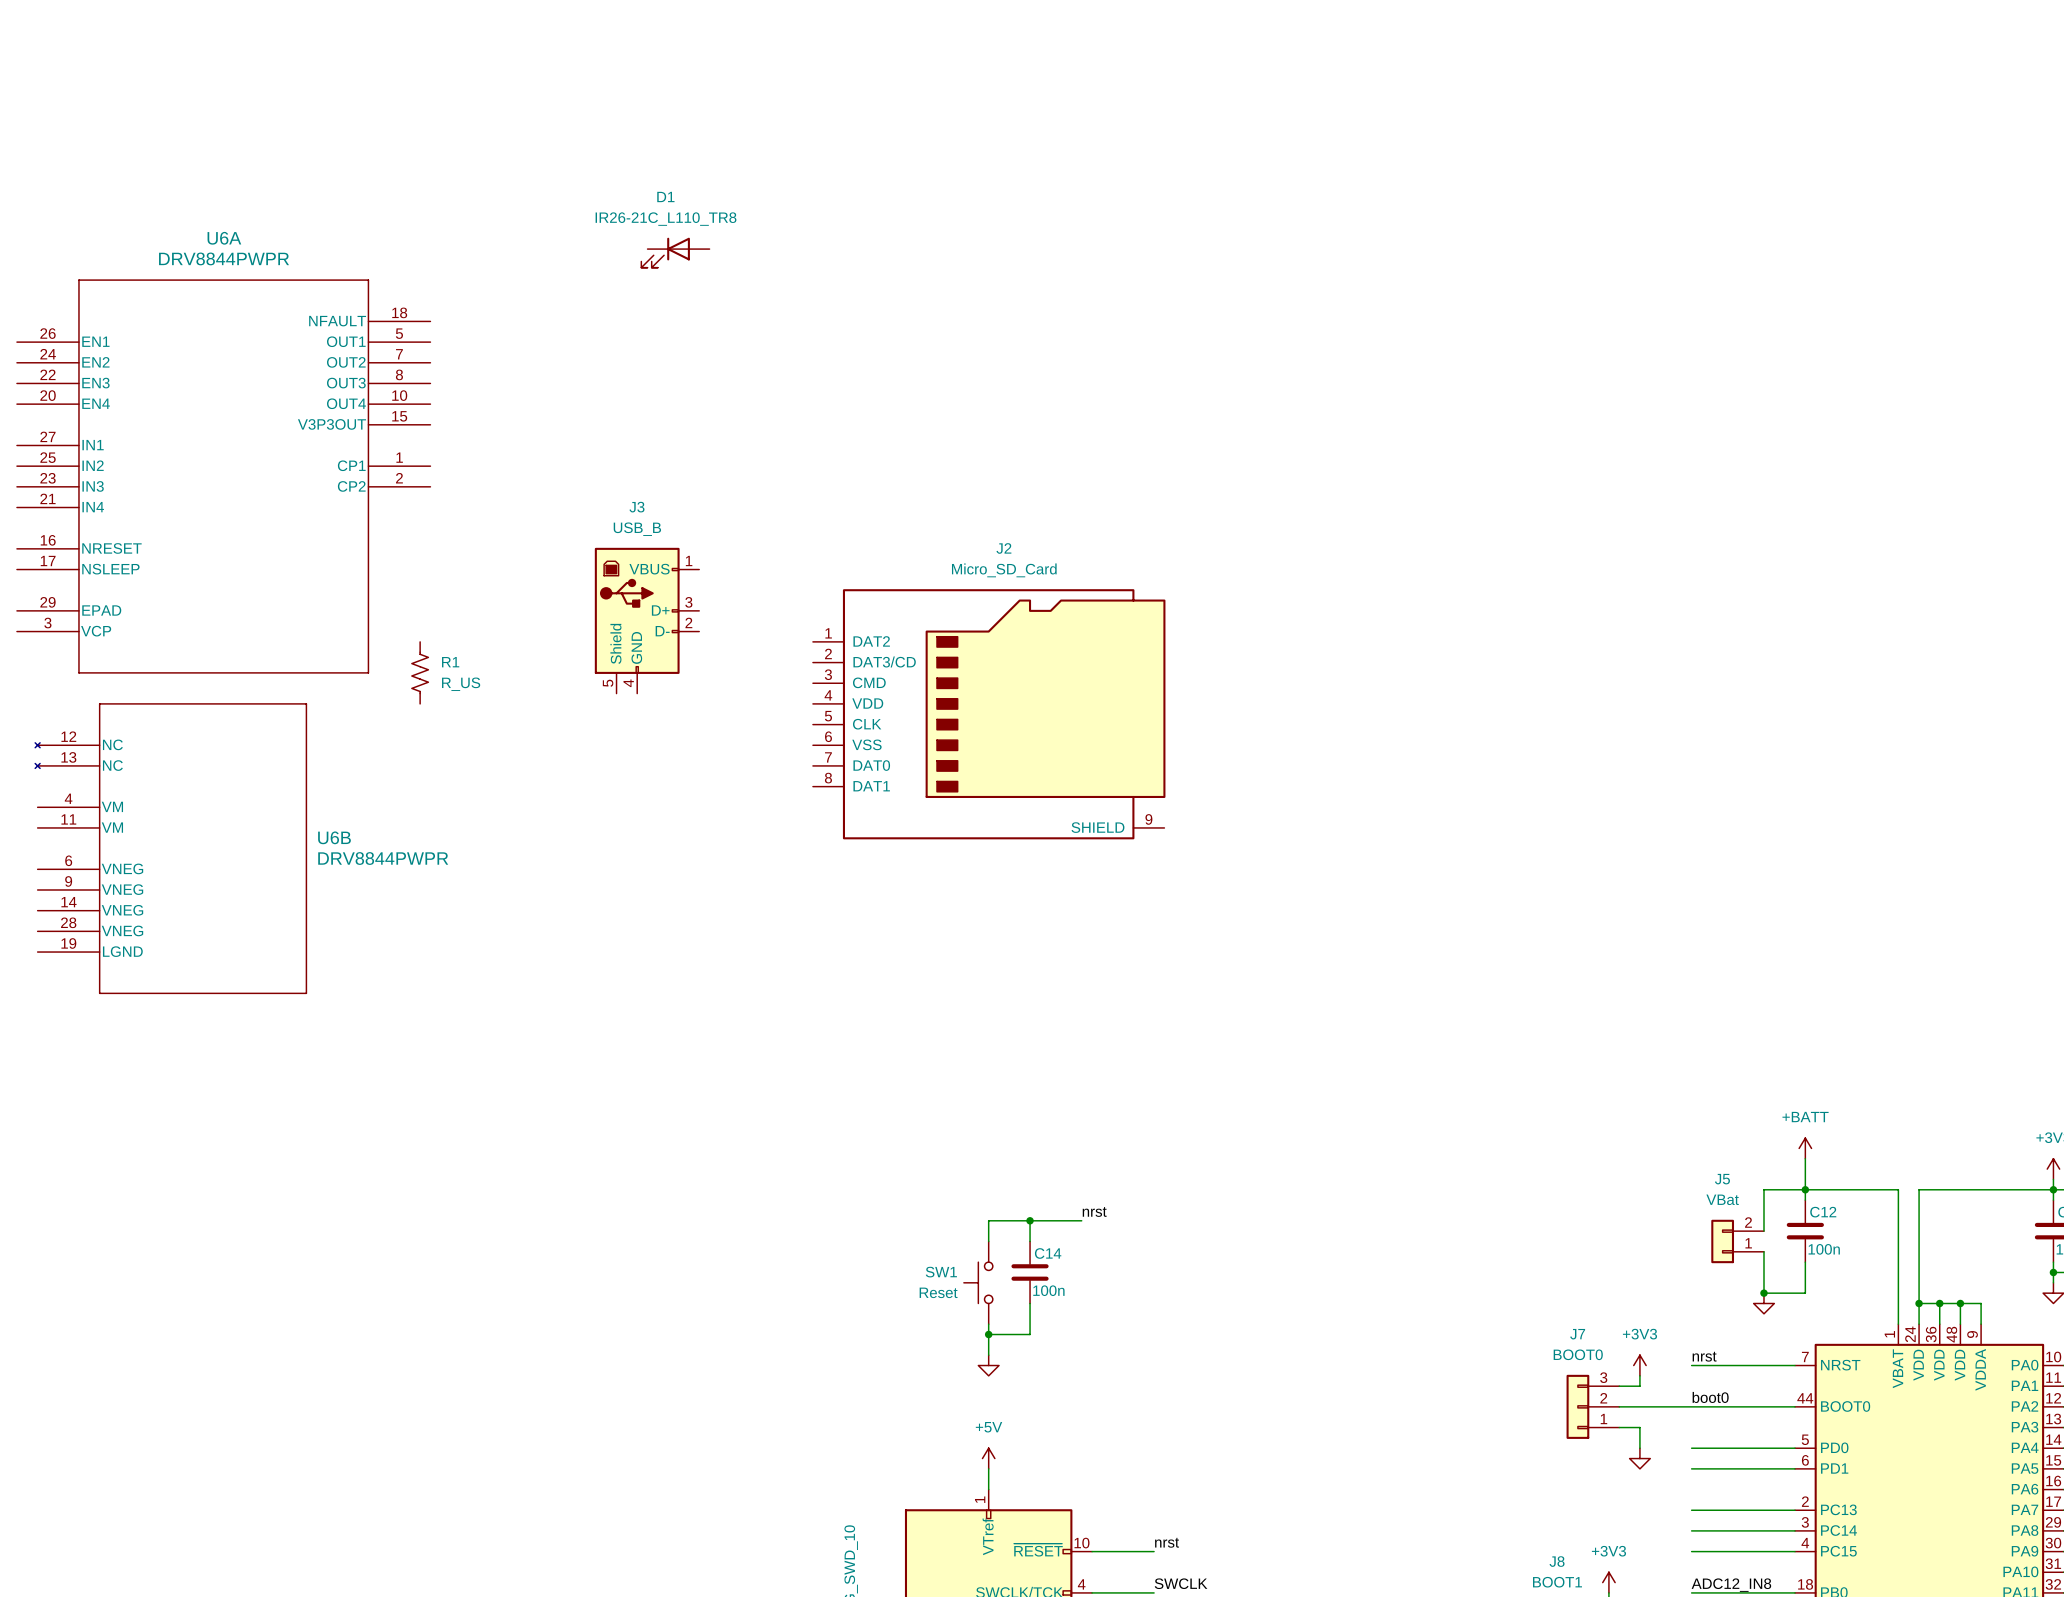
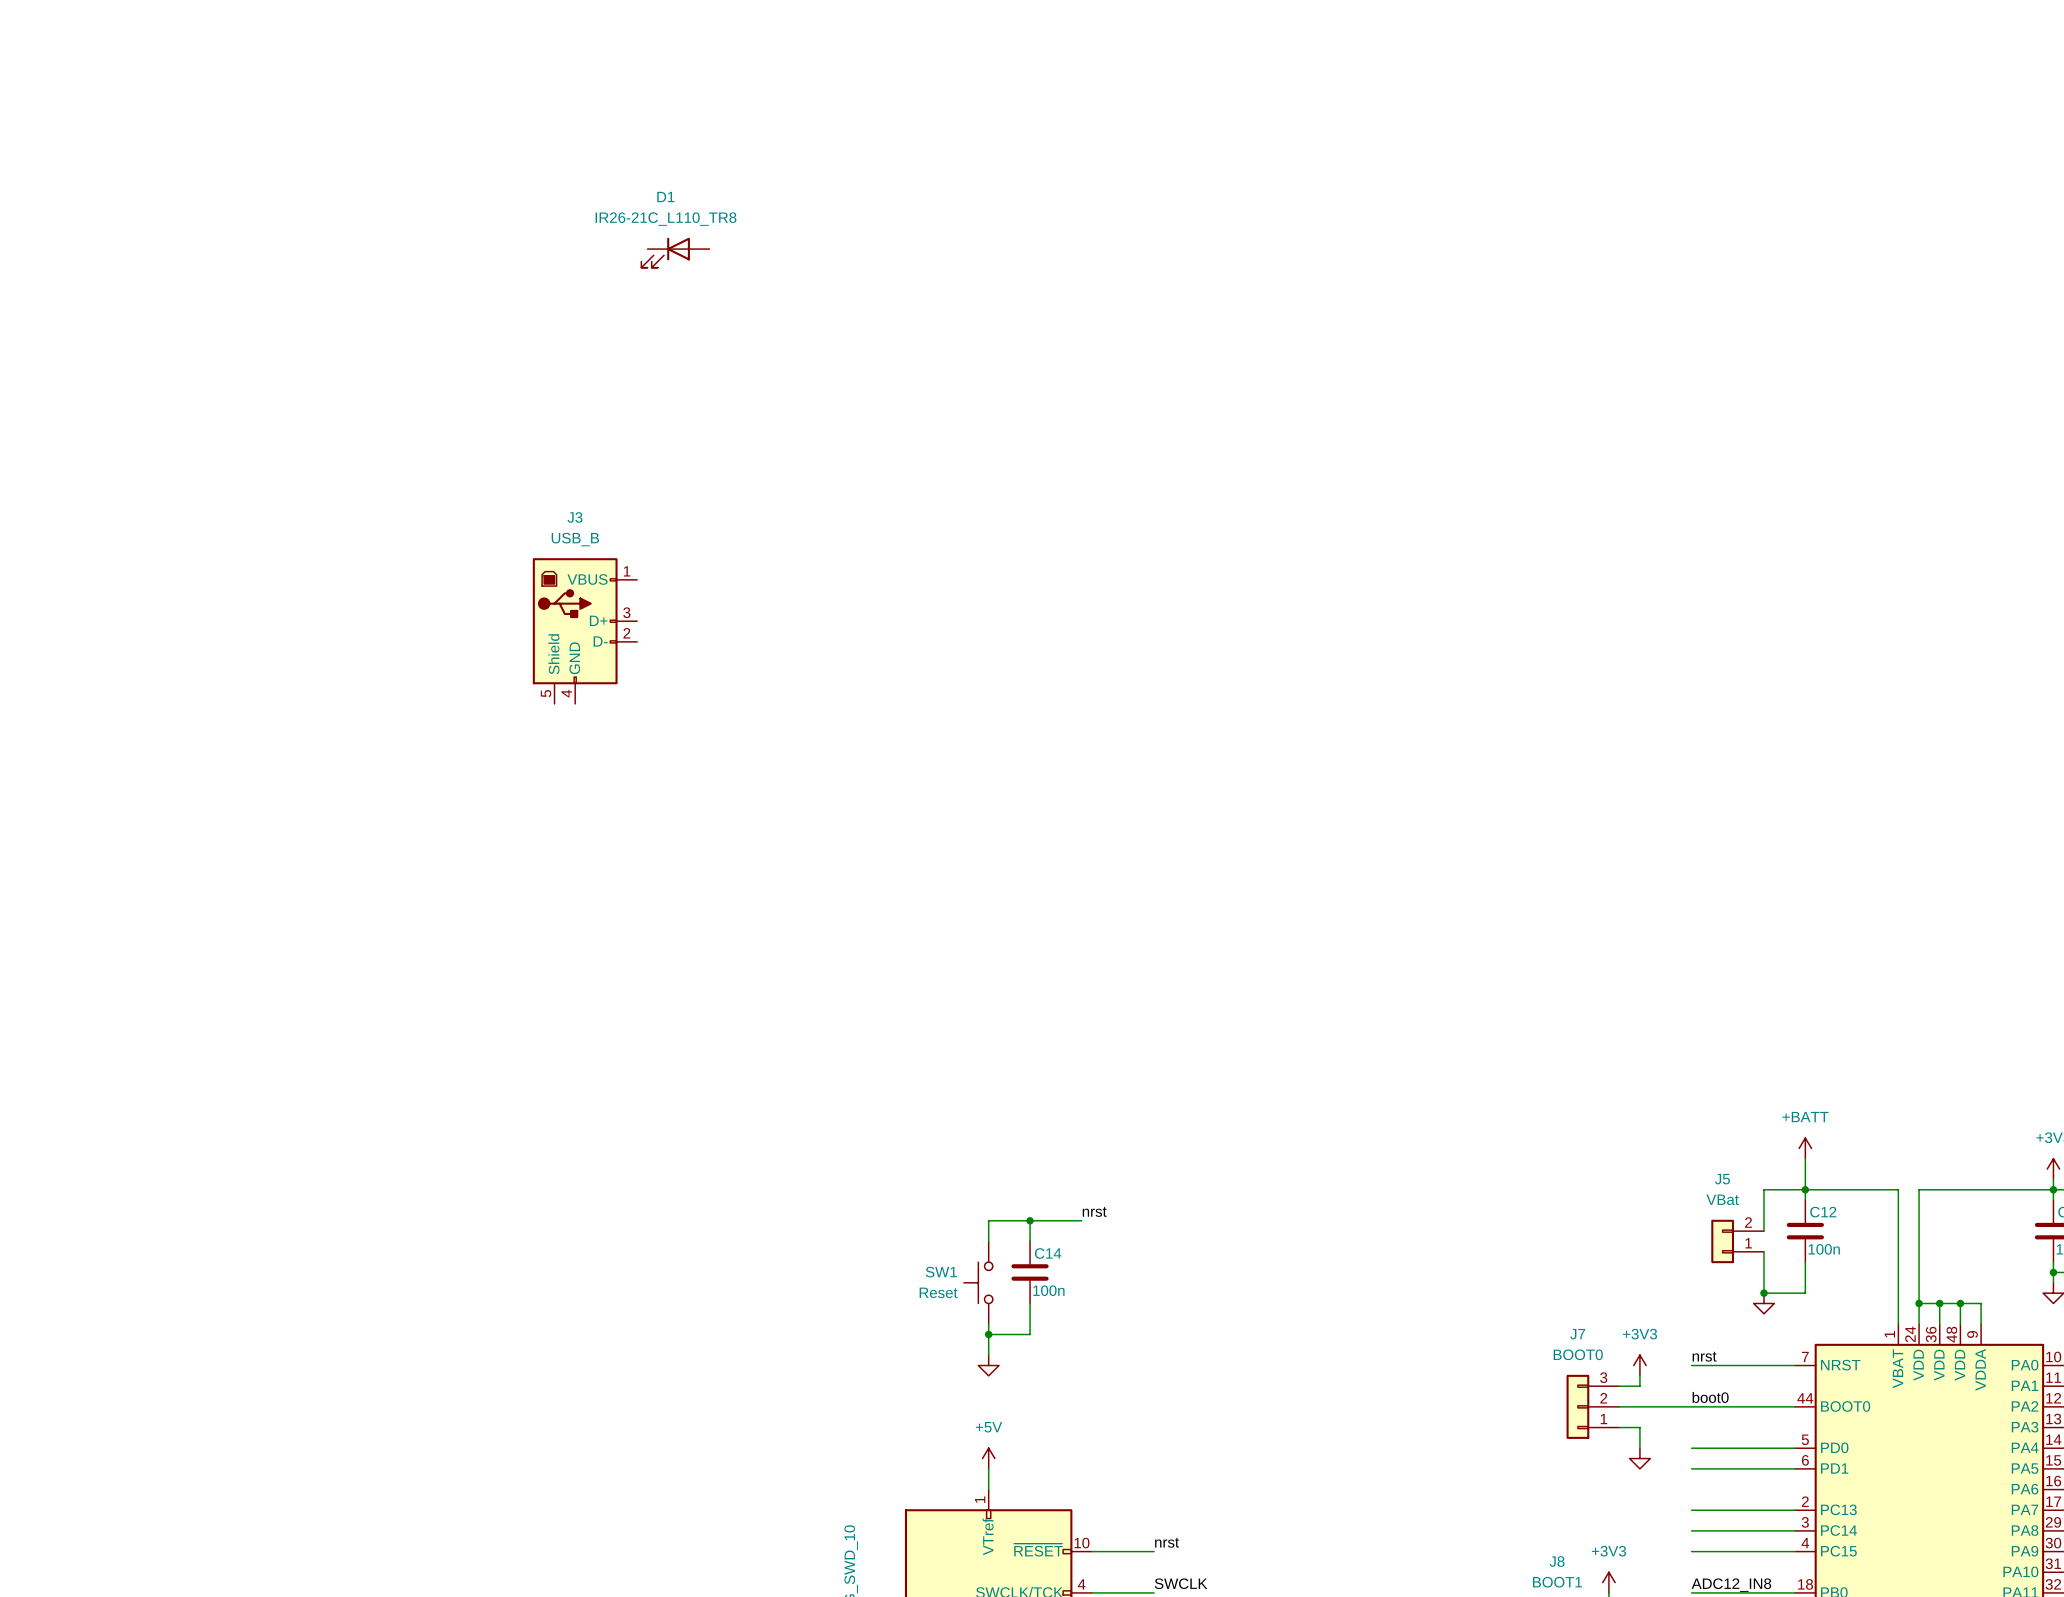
U6A: DRV8844PWPR (223, 476) -> none
J3 position: (647, 620) -> (585, 631)
R1: R_US (420, 672) -> none
J2: Micro_SD_Card (989, 714) -> none
U6B: DRV8844PWPR (171, 848) -> none

